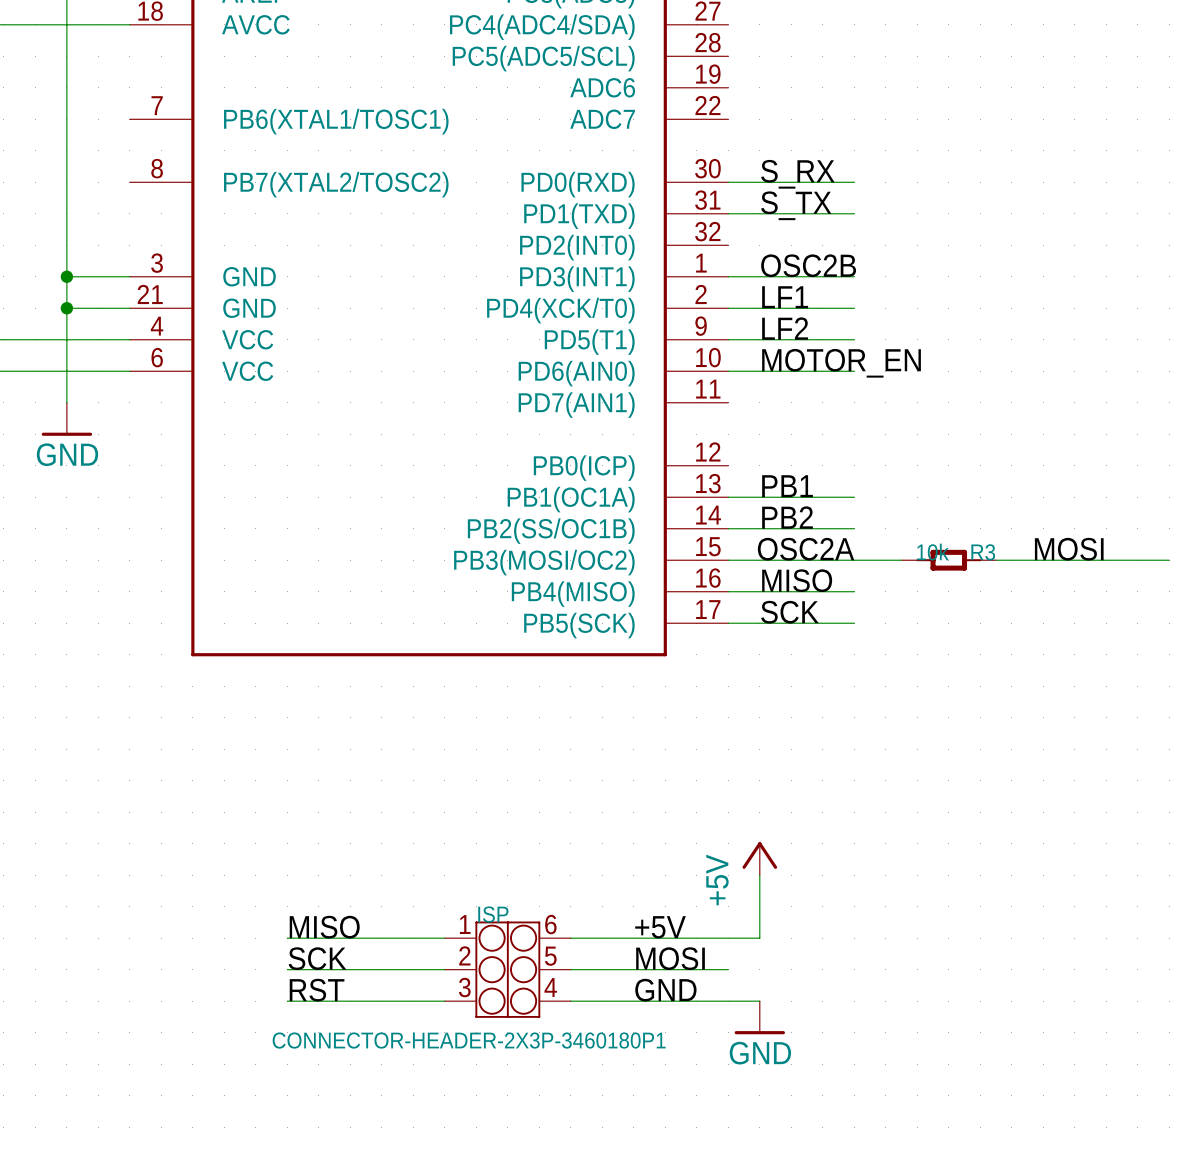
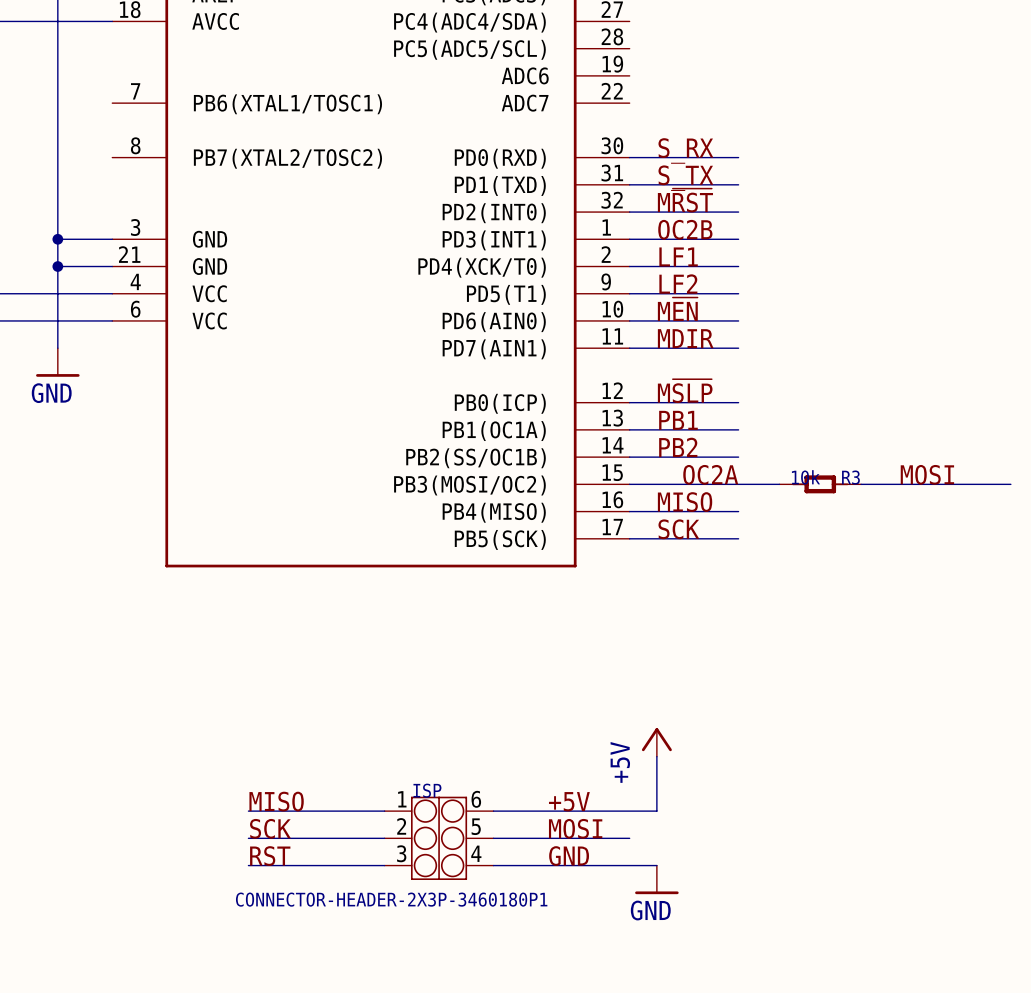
label: none -> M~{RST} (685, 200)
wire: none -> (629, 212) (738, 212)
label: OSC2B (808, 265) -> OC2B (685, 229)
label: MOTOR_EN (841, 363) -> M~{EN} (677, 309)
label: none -> MDIR (685, 338)
wire: none -> (629, 348) (738, 348)
label: none -> M~{SLP} (685, 391)
wire: none -> (629, 402) (738, 402)
label: OSC2A (806, 549) -> OC2A (710, 474)

